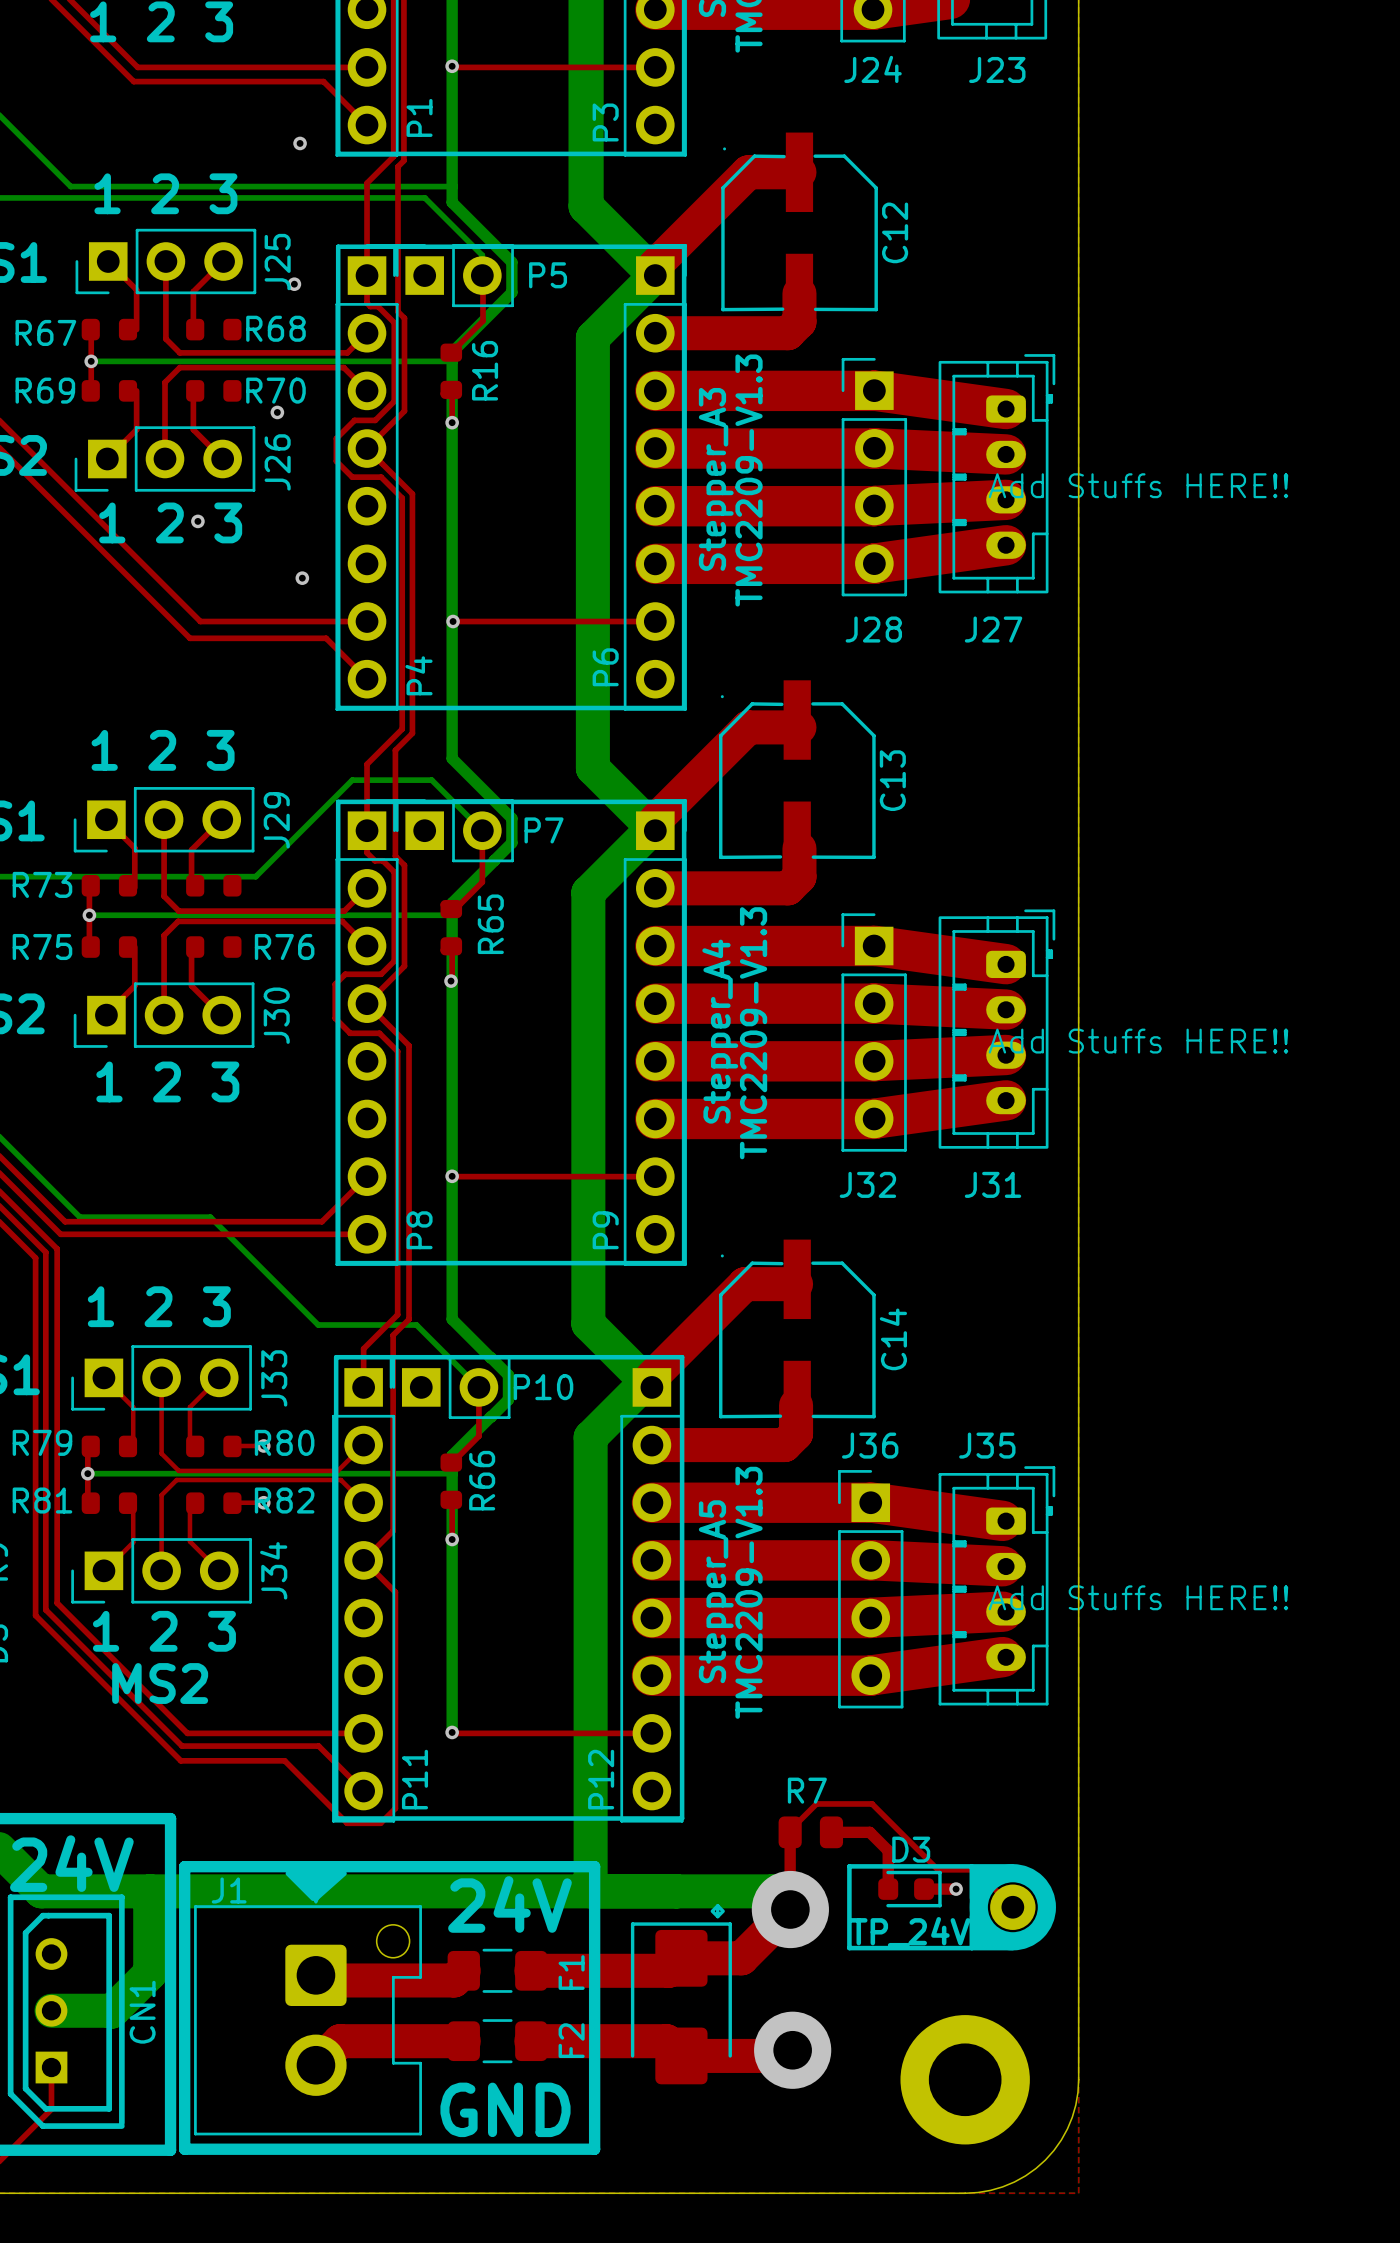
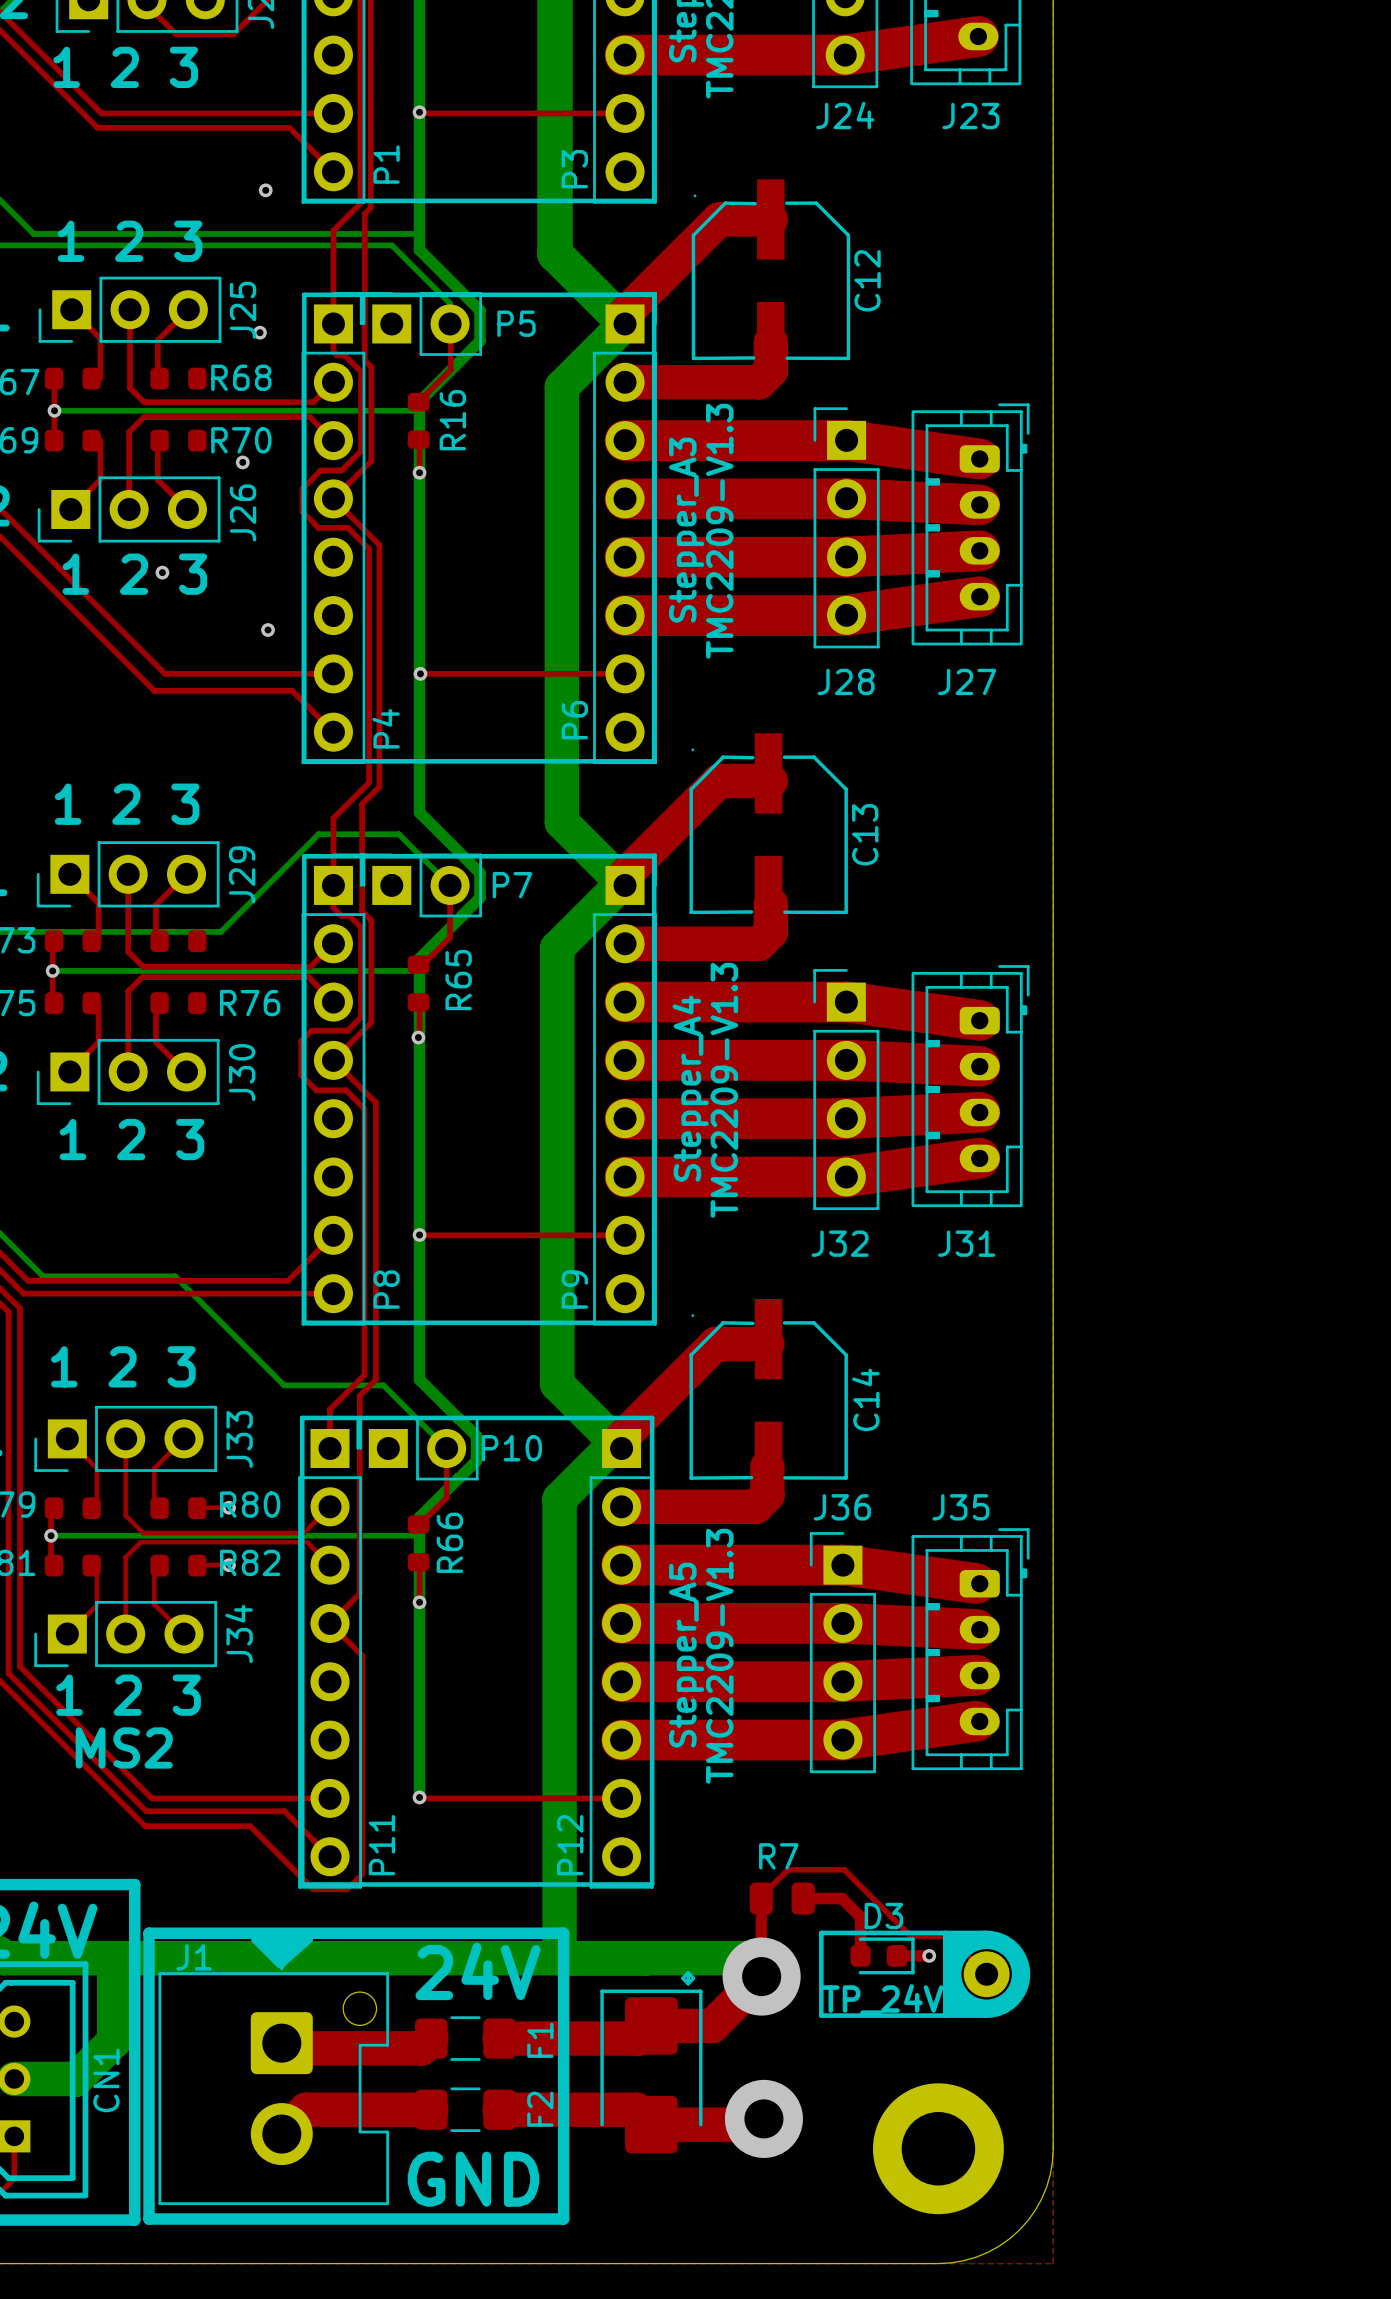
text: Add Stuffs HERE!! (1138, 485) -> none
text: Add Stuffs HERE!! (1138, 1041) -> none
text: Add Stuffs HERE!! (1138, 1597) -> none

